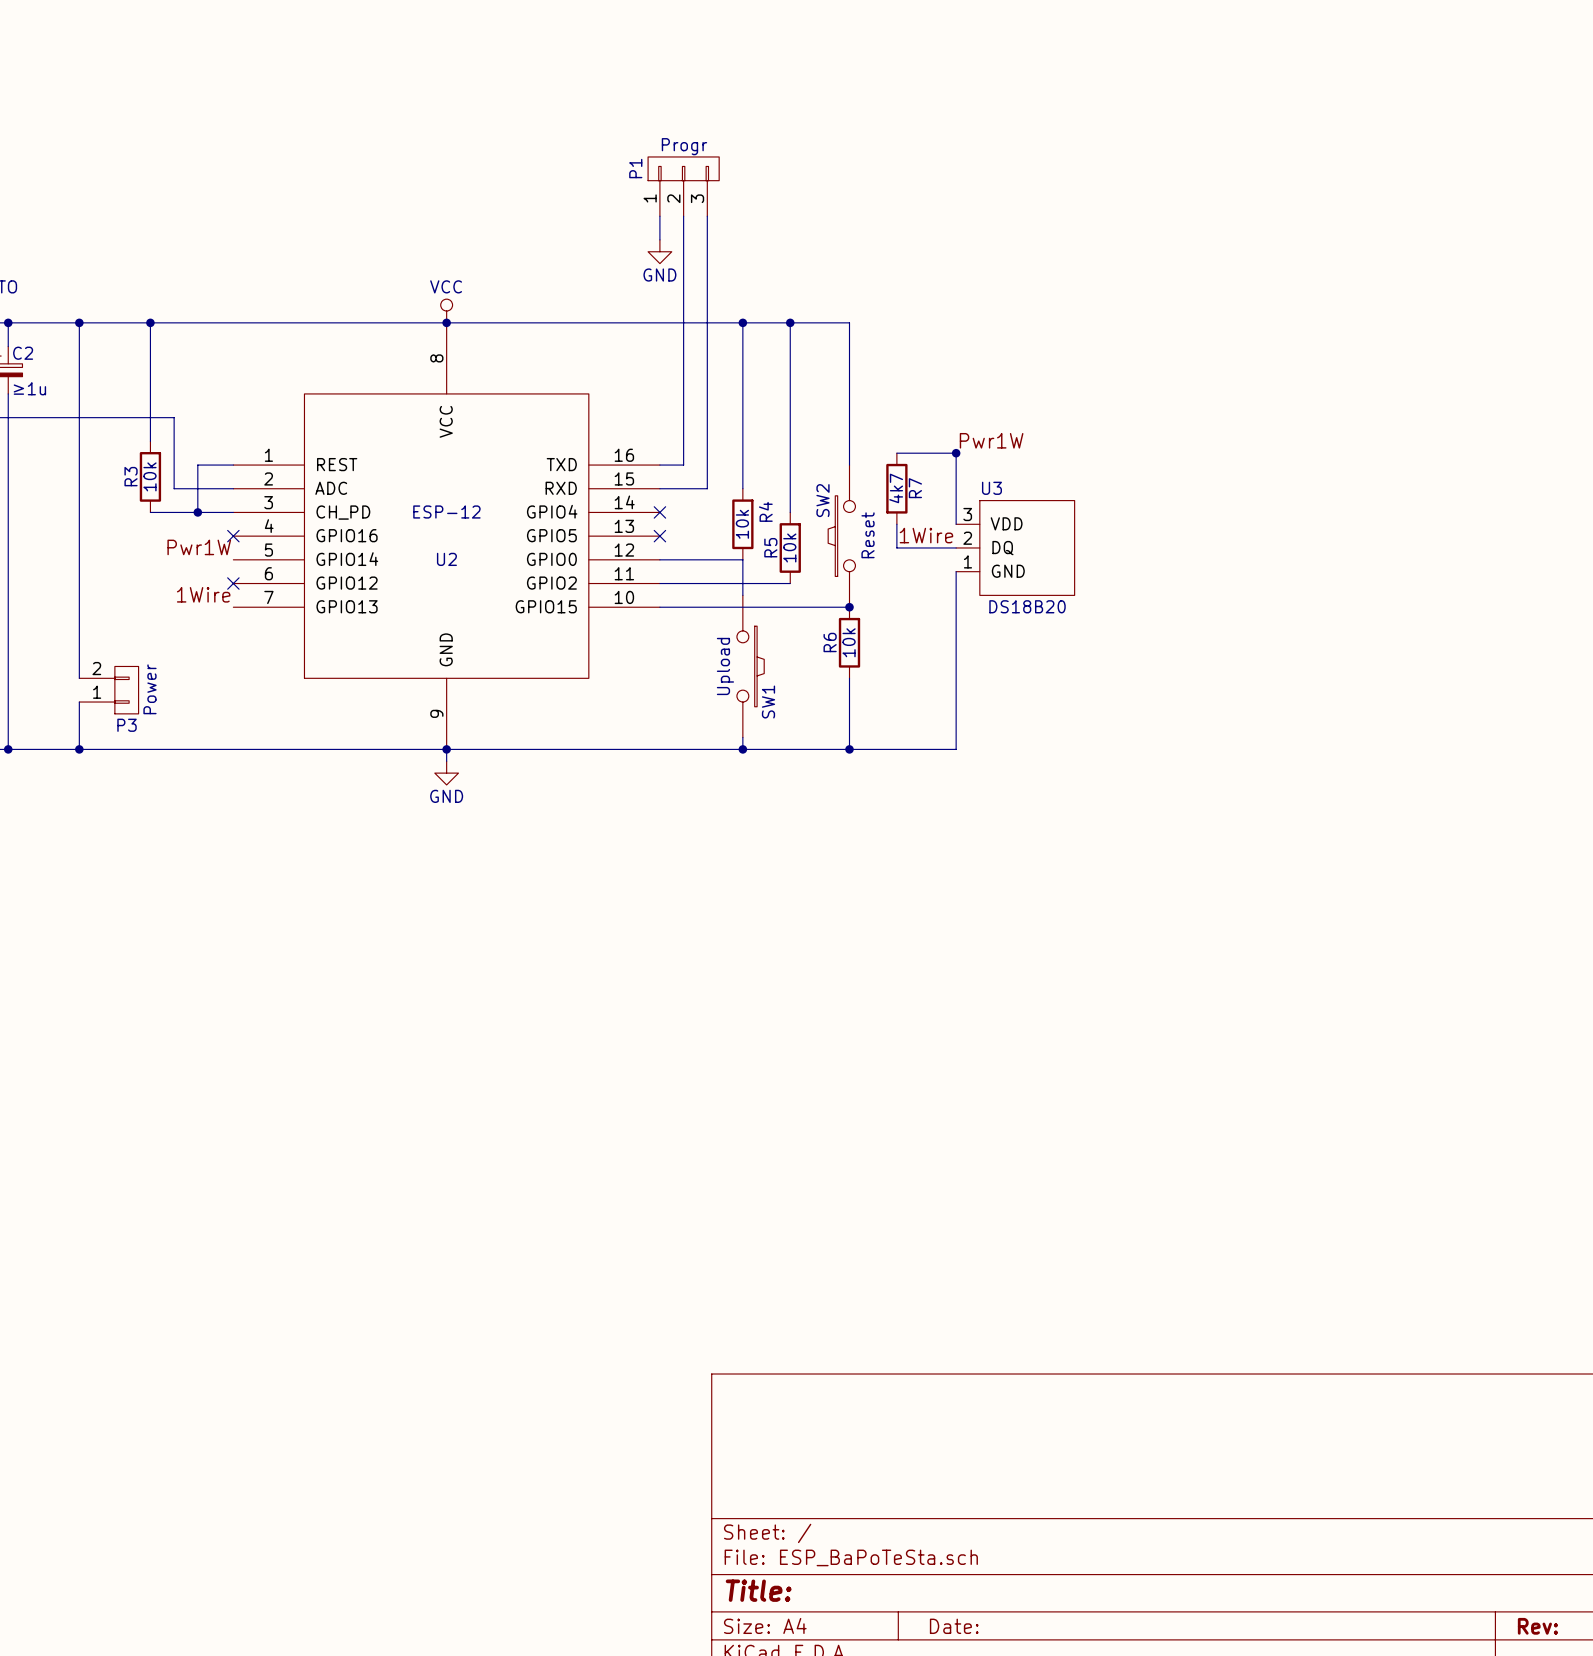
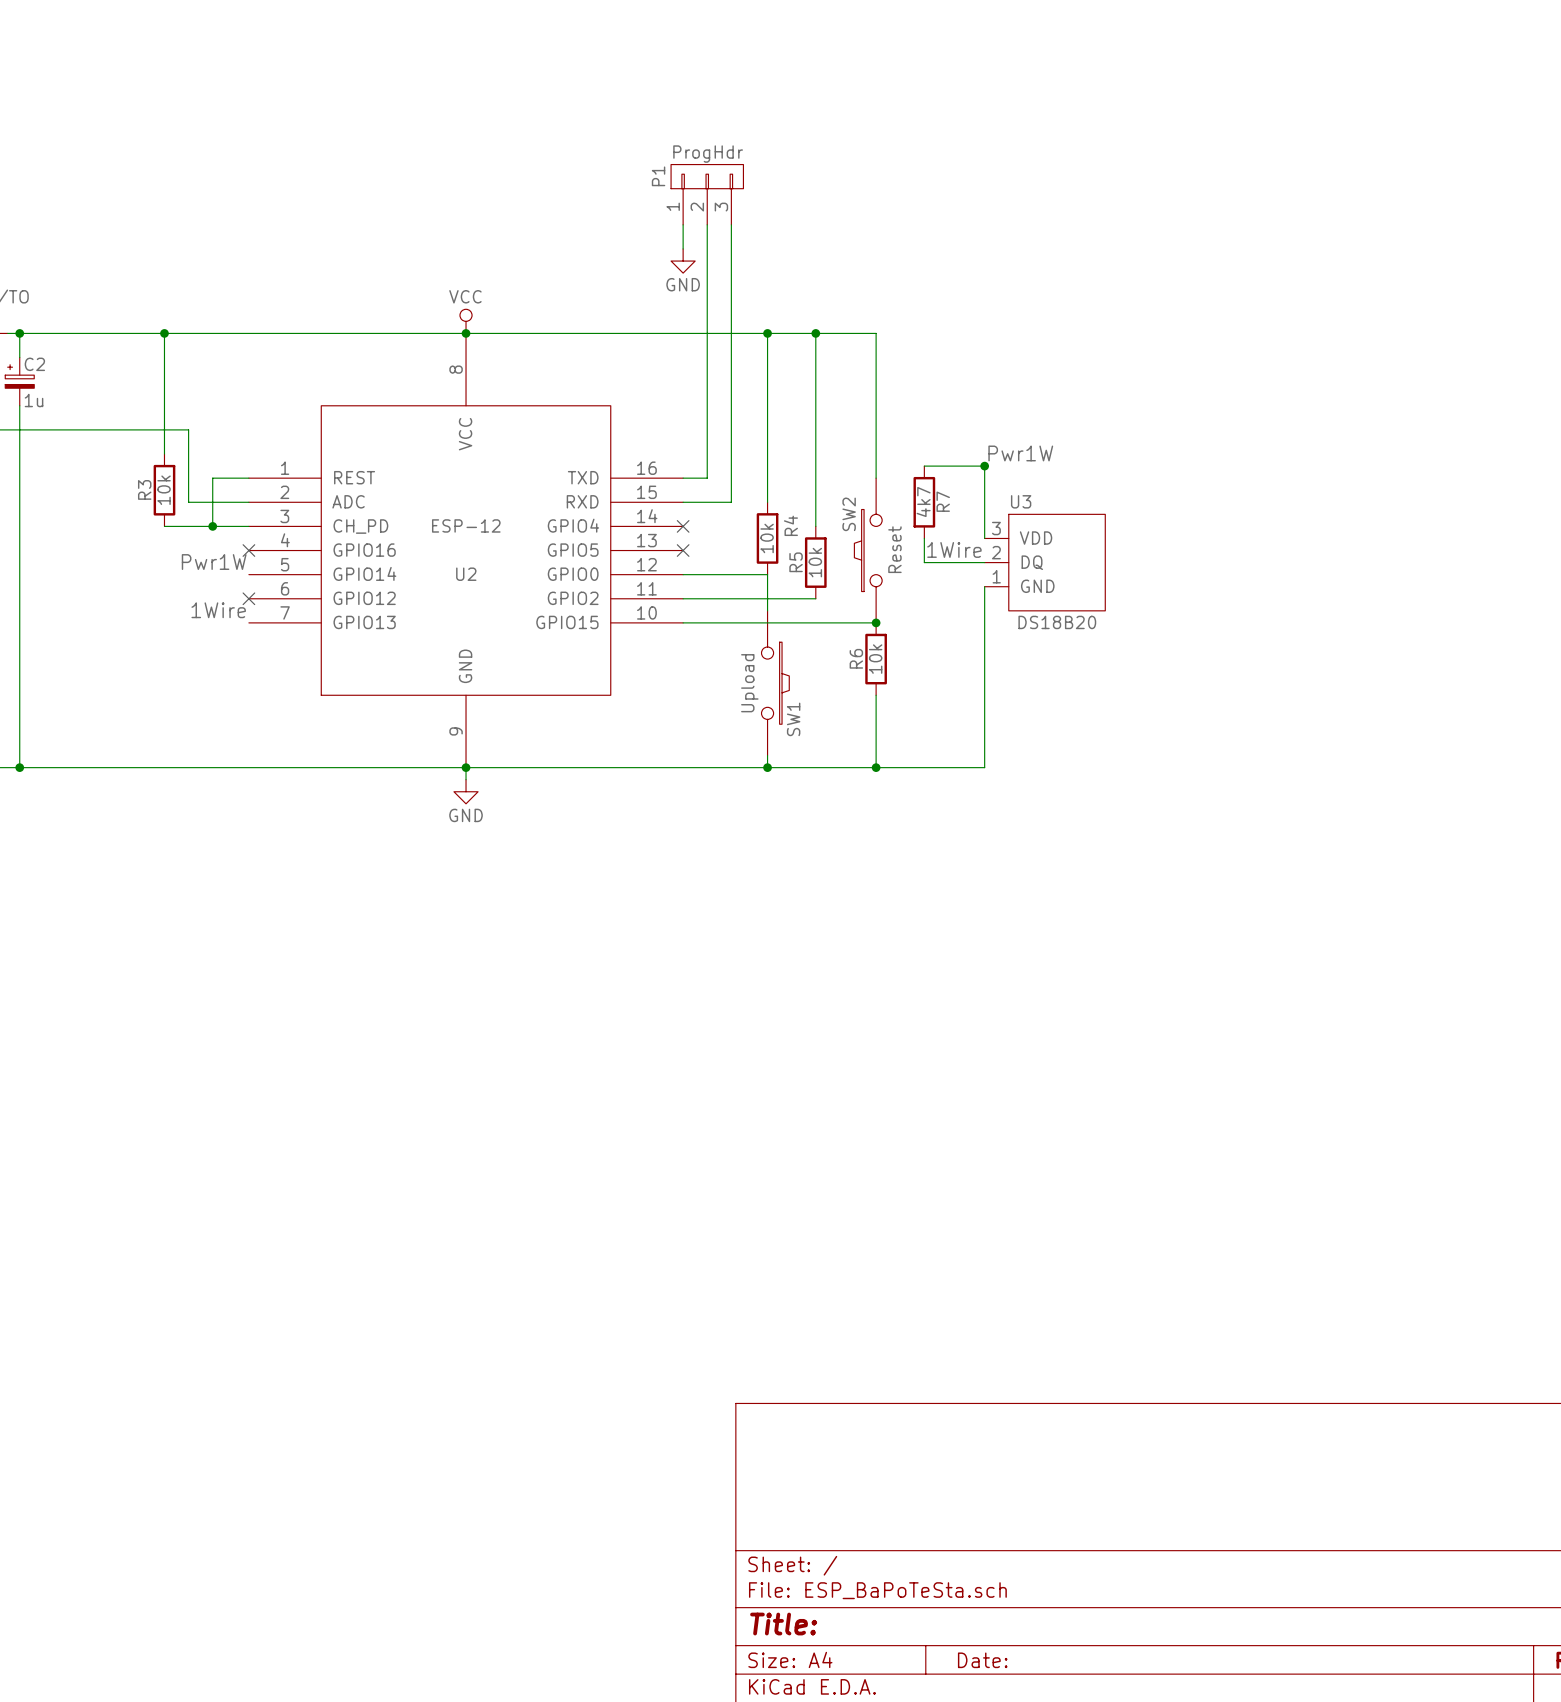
P1 value: Progr (684, 146) -> ProgHdr (708, 154)
wire: (79, 322) (79, 678) -> none
junction: (79, 322) -> none
C2 value: ≥1u (29, 388) -> 1u (34, 400)
P3: Power (108, 690) -> none
wire: (79, 702) (79, 749) -> none
junction: (79, 749) -> none

